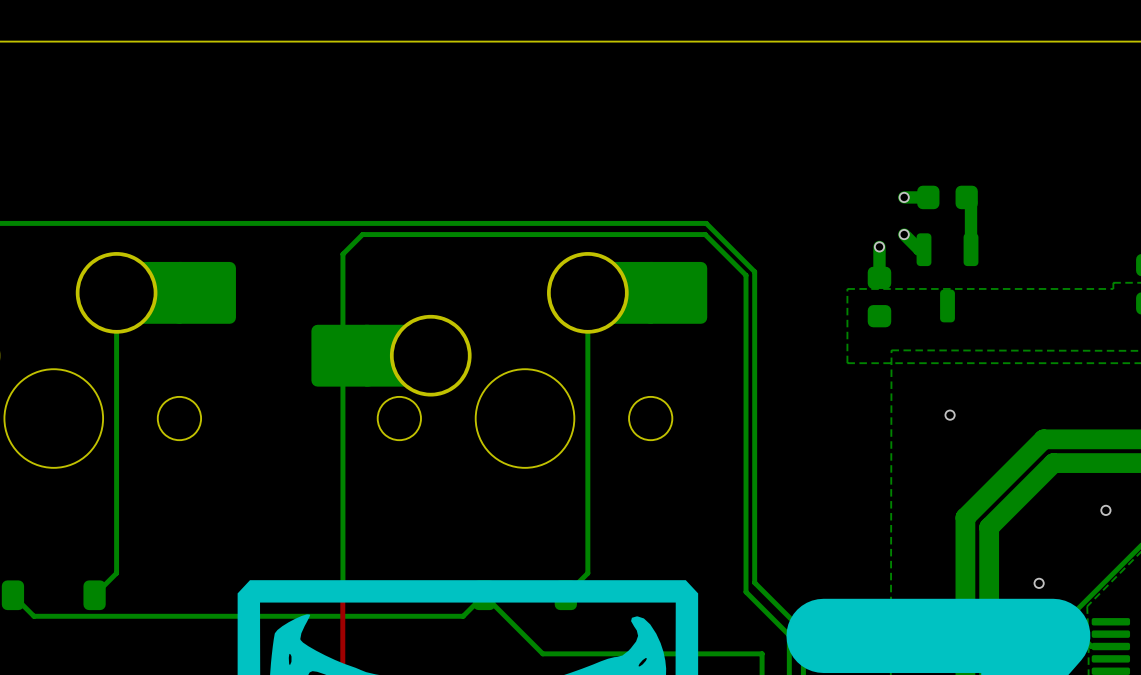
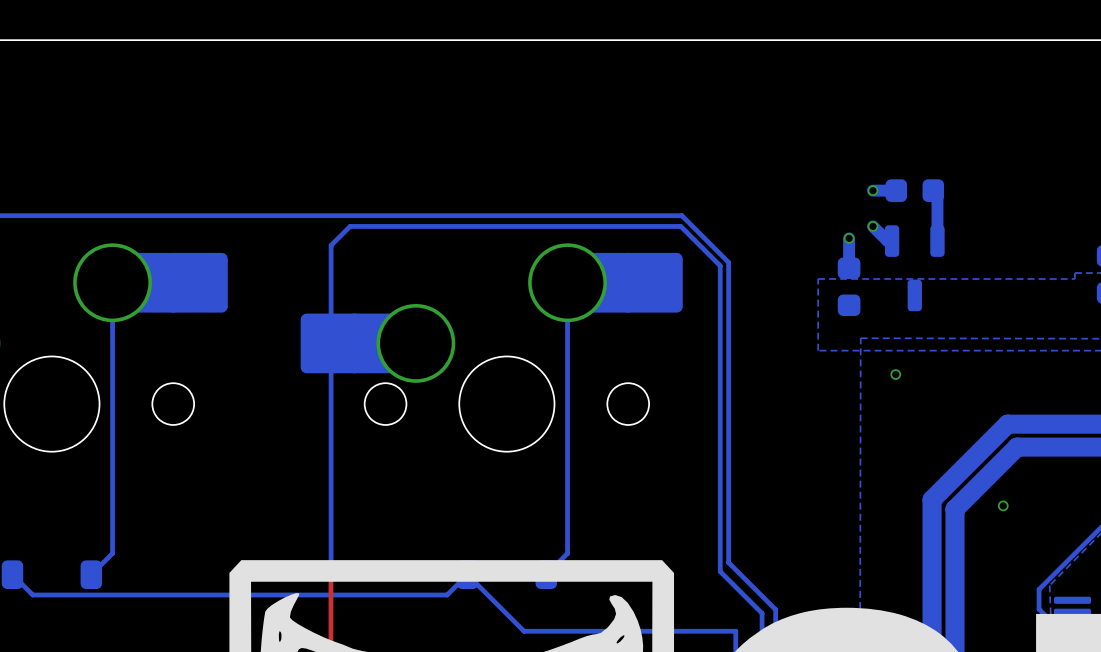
via position: (950, 415) -> (895, 374)
via: (1105, 510) -> none
via: none -> (1003, 505)
via: (1039, 583) -> none

